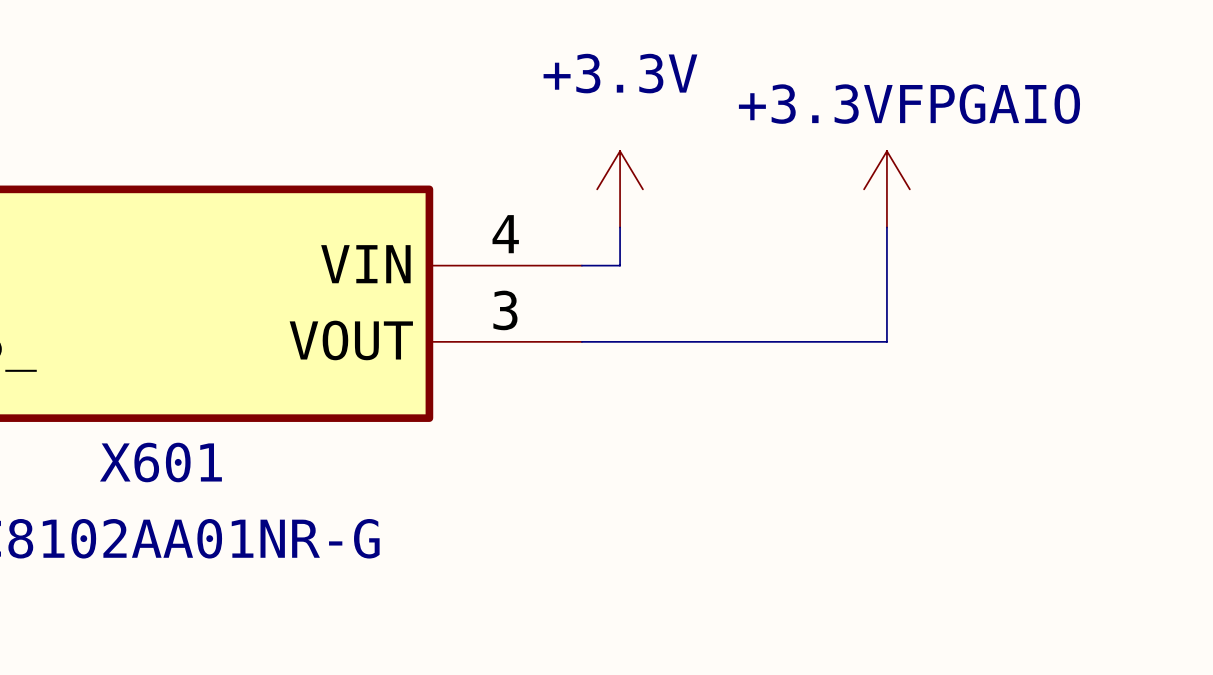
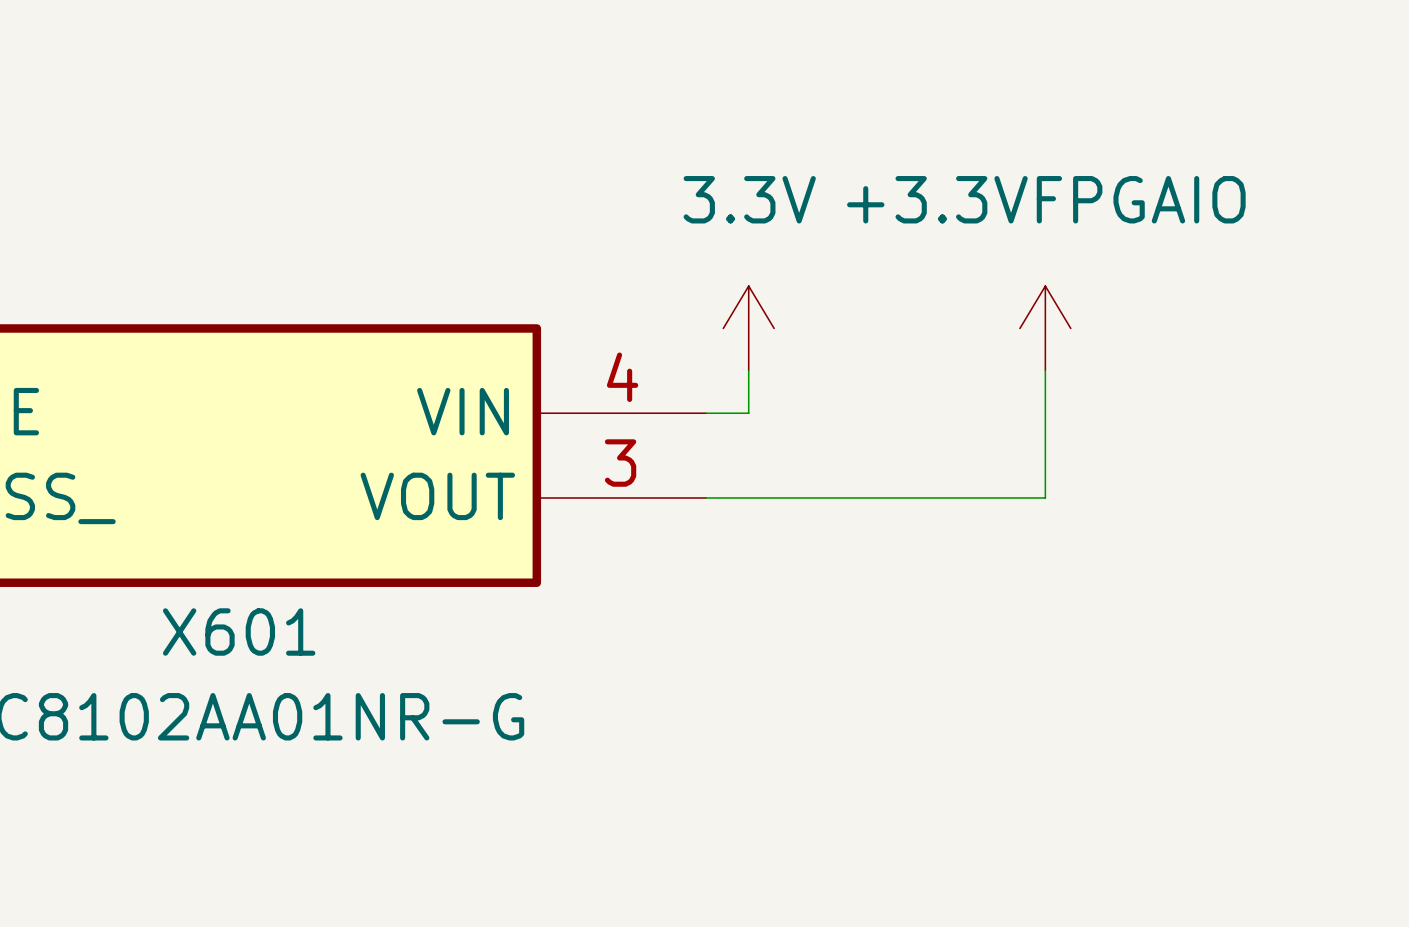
power symbol text position: +3.3VFPGAIO (909, 104) -> +3.3VFPGAIO (1046, 199)
power symbol: +3.3V (620, 189) -> 3.3V (748, 328)

